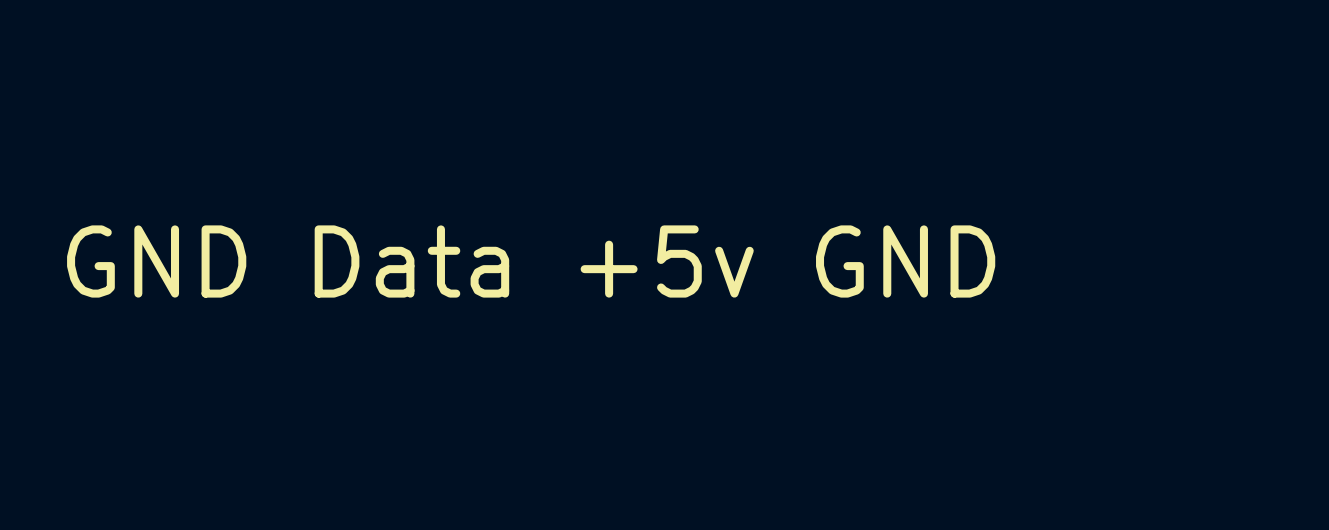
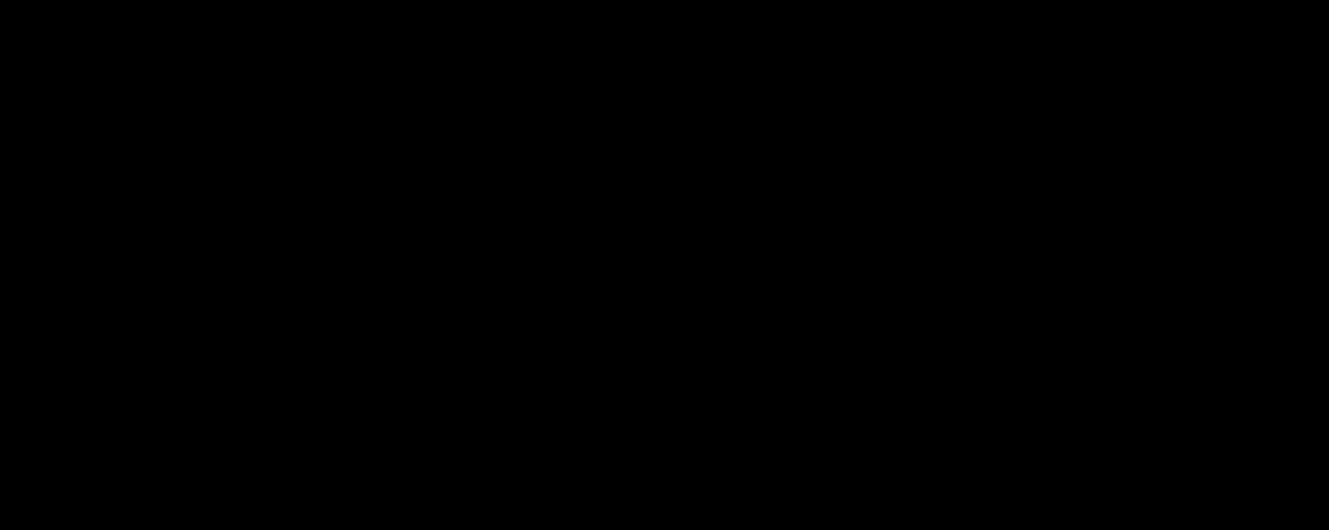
text: GND Data +5v GND (531, 261) -> none

